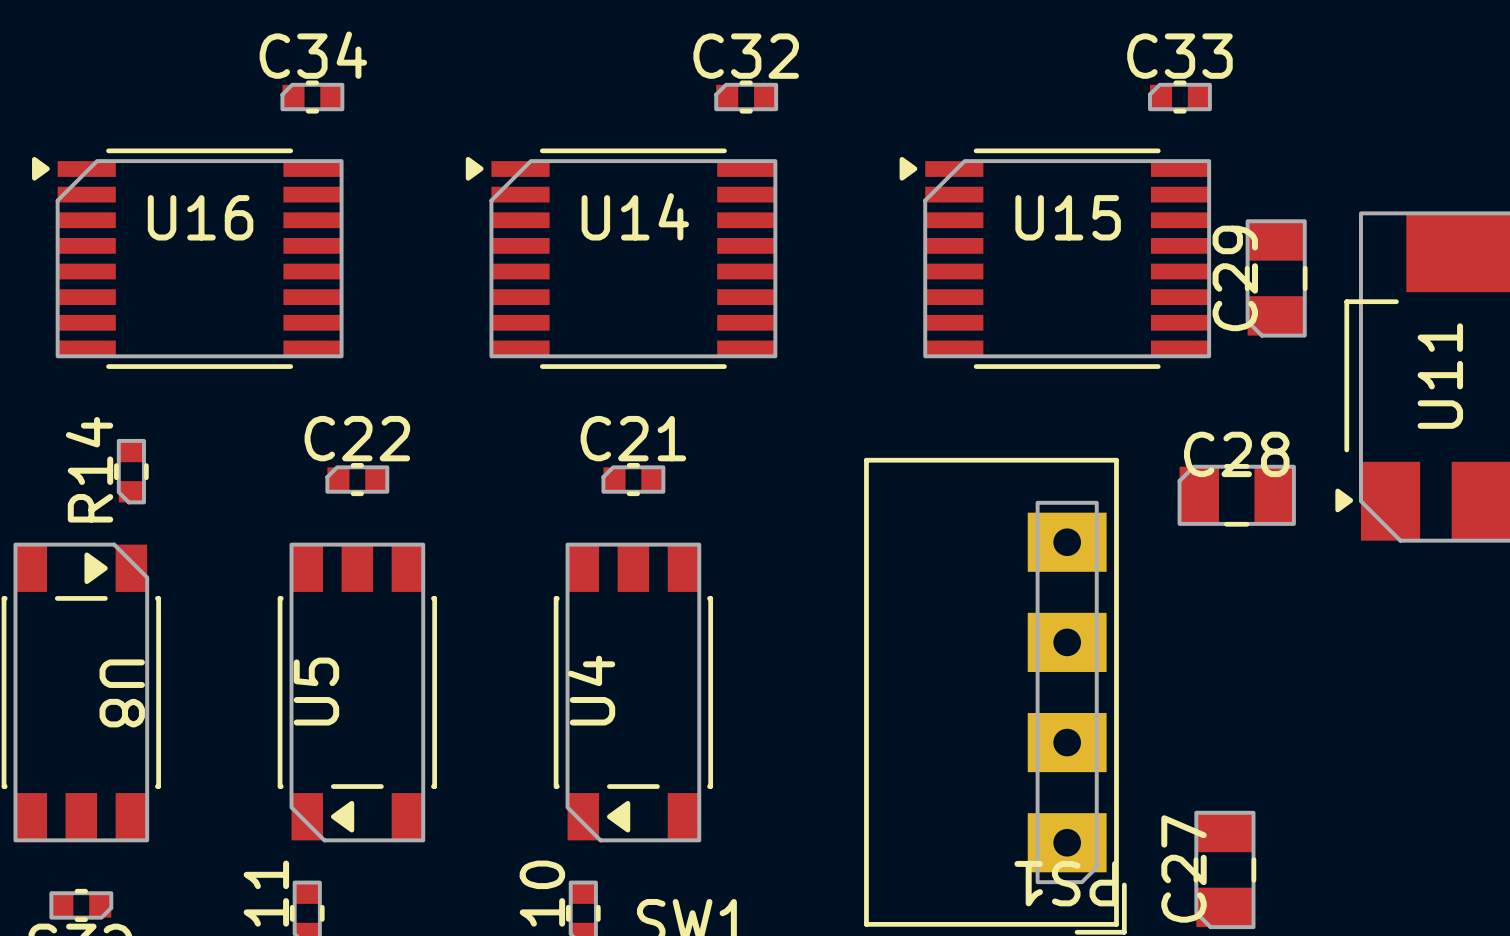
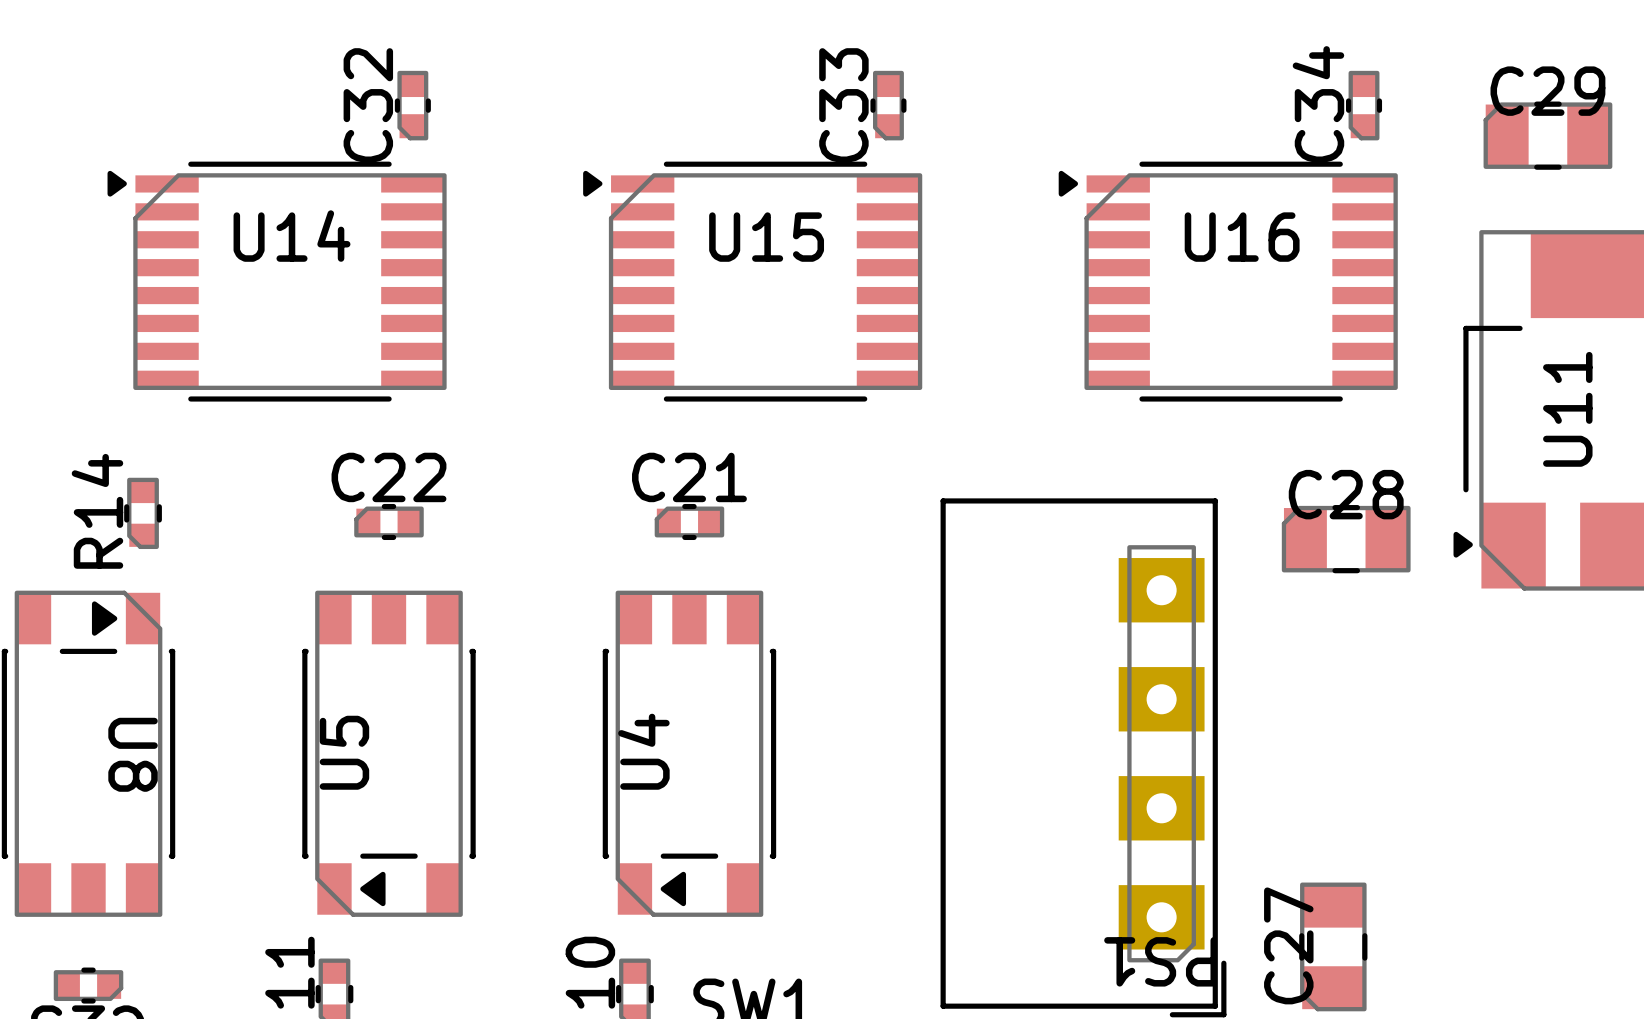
C34 rotation: 0° (312, 97) -> 90° counterclockwise (1364, 105)
C34 position: (312, 97) -> (1364, 105)
C32 rotation: 0° (746, 97) -> 90° counterclockwise (412, 105)
C32 position: (746, 97) -> (412, 105)
C33 rotation: 0° (1179, 97) -> 90° counterclockwise (888, 105)
C33 position: (1179, 97) -> (888, 105)
U16 position: (187, 258) -> (1228, 281)
U14 position: (621, 258) -> (277, 281)
U15 position: (1055, 258) -> (752, 281)
C29 rotation: 0° (1276, 278) -> 90° clockwise (1547, 135)
C29 position: (1276, 278) -> (1547, 135)

